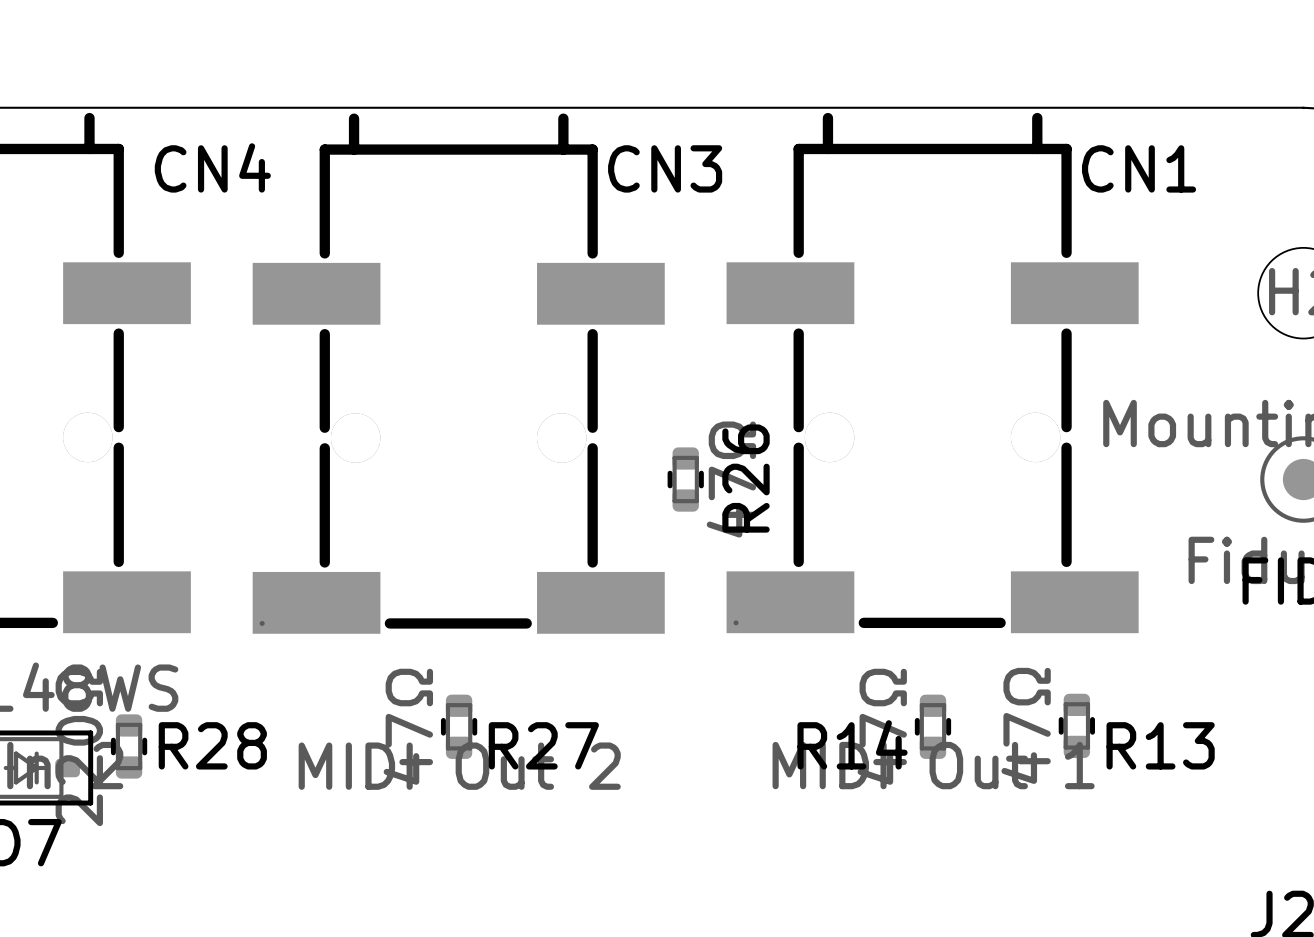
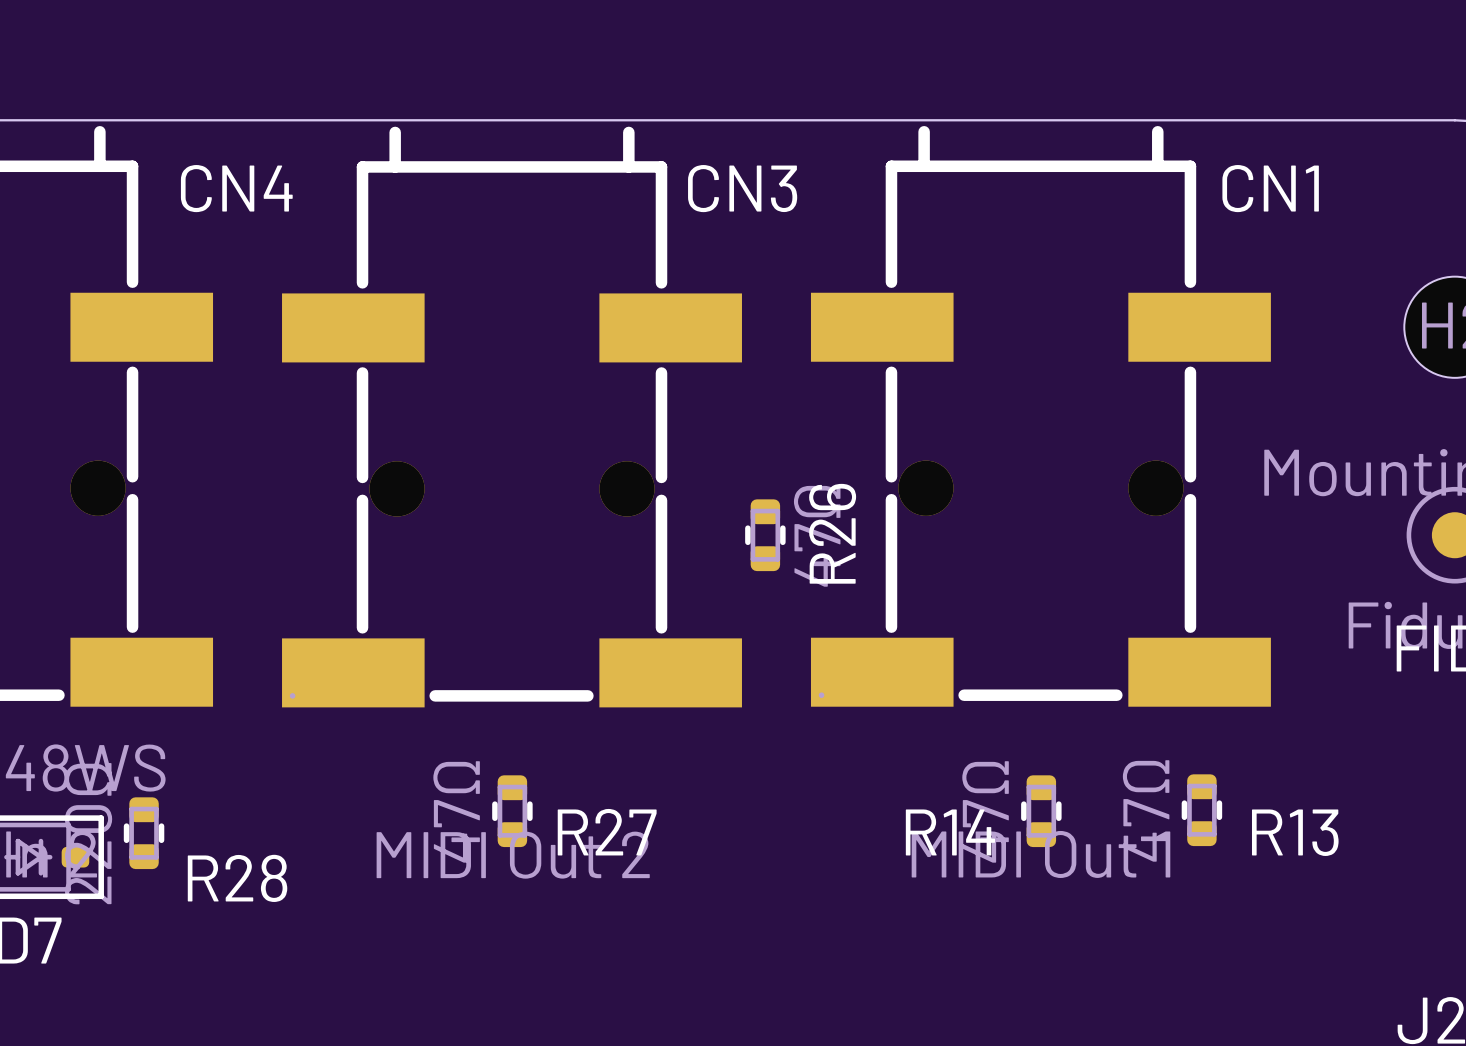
R28 name position: R28 (212, 745) -> R28 (237, 878)

